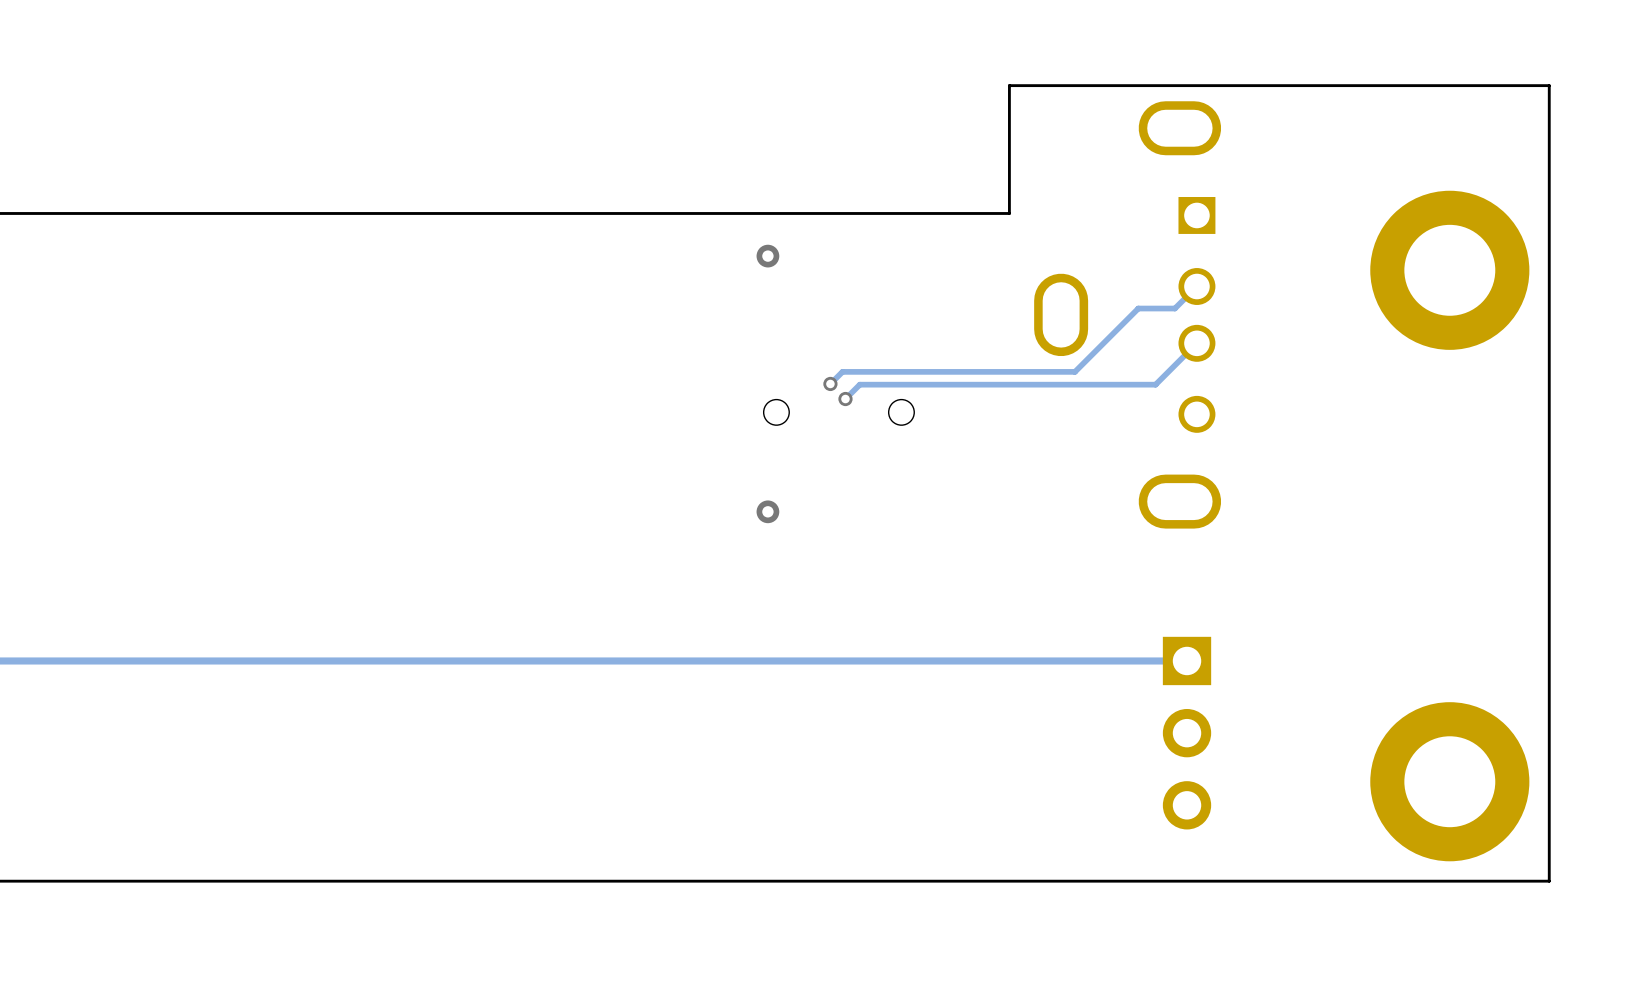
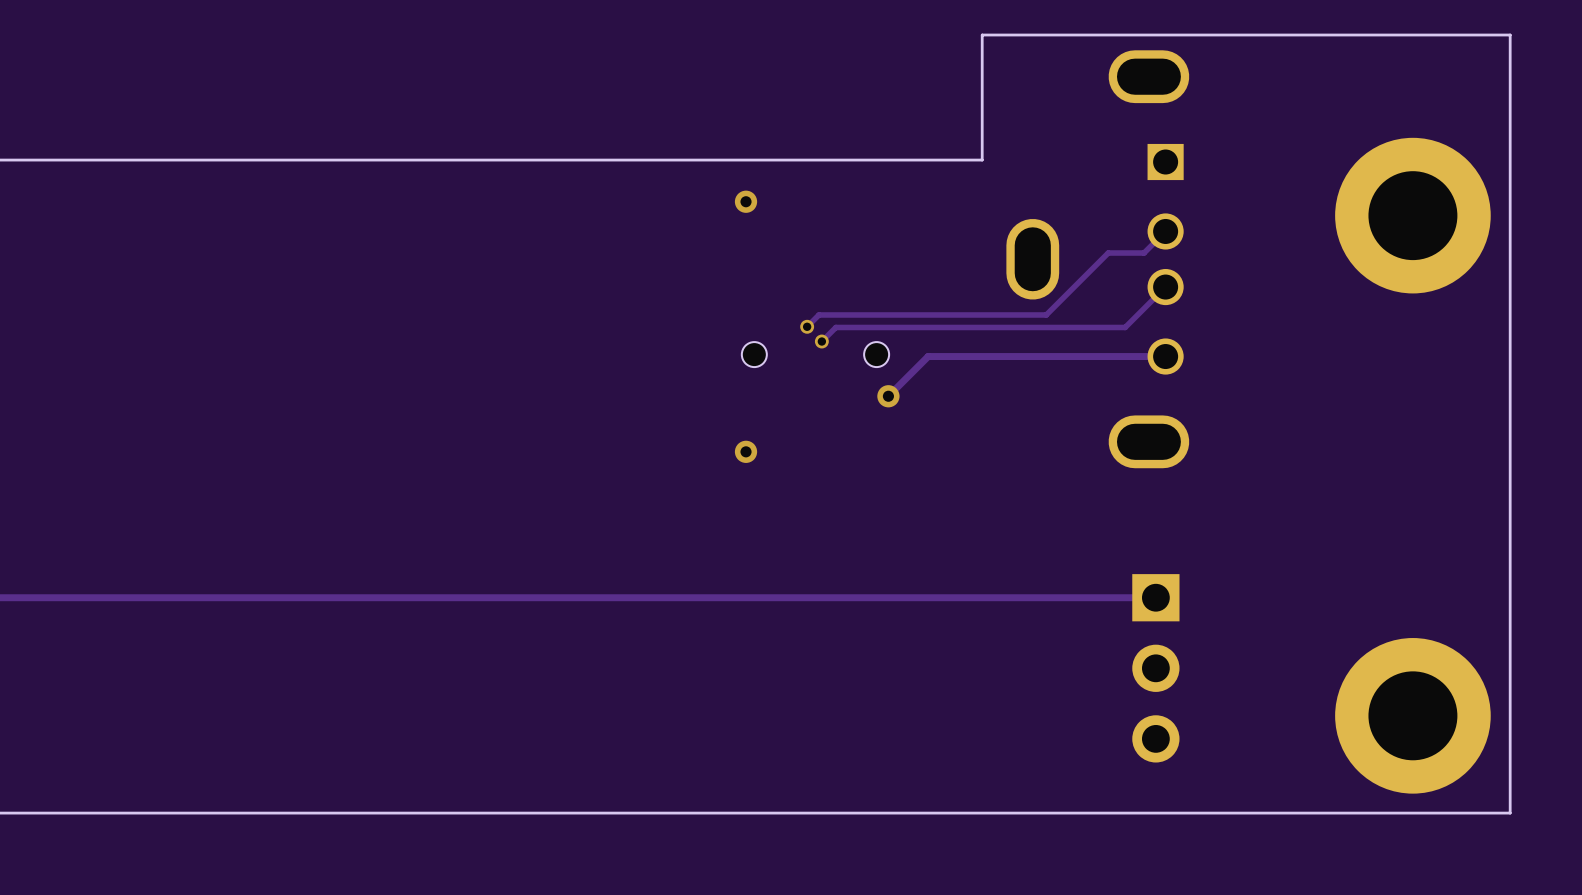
track: none -> (1165, 356) (928, 356) (888, 396)
via: none -> (888, 396)

